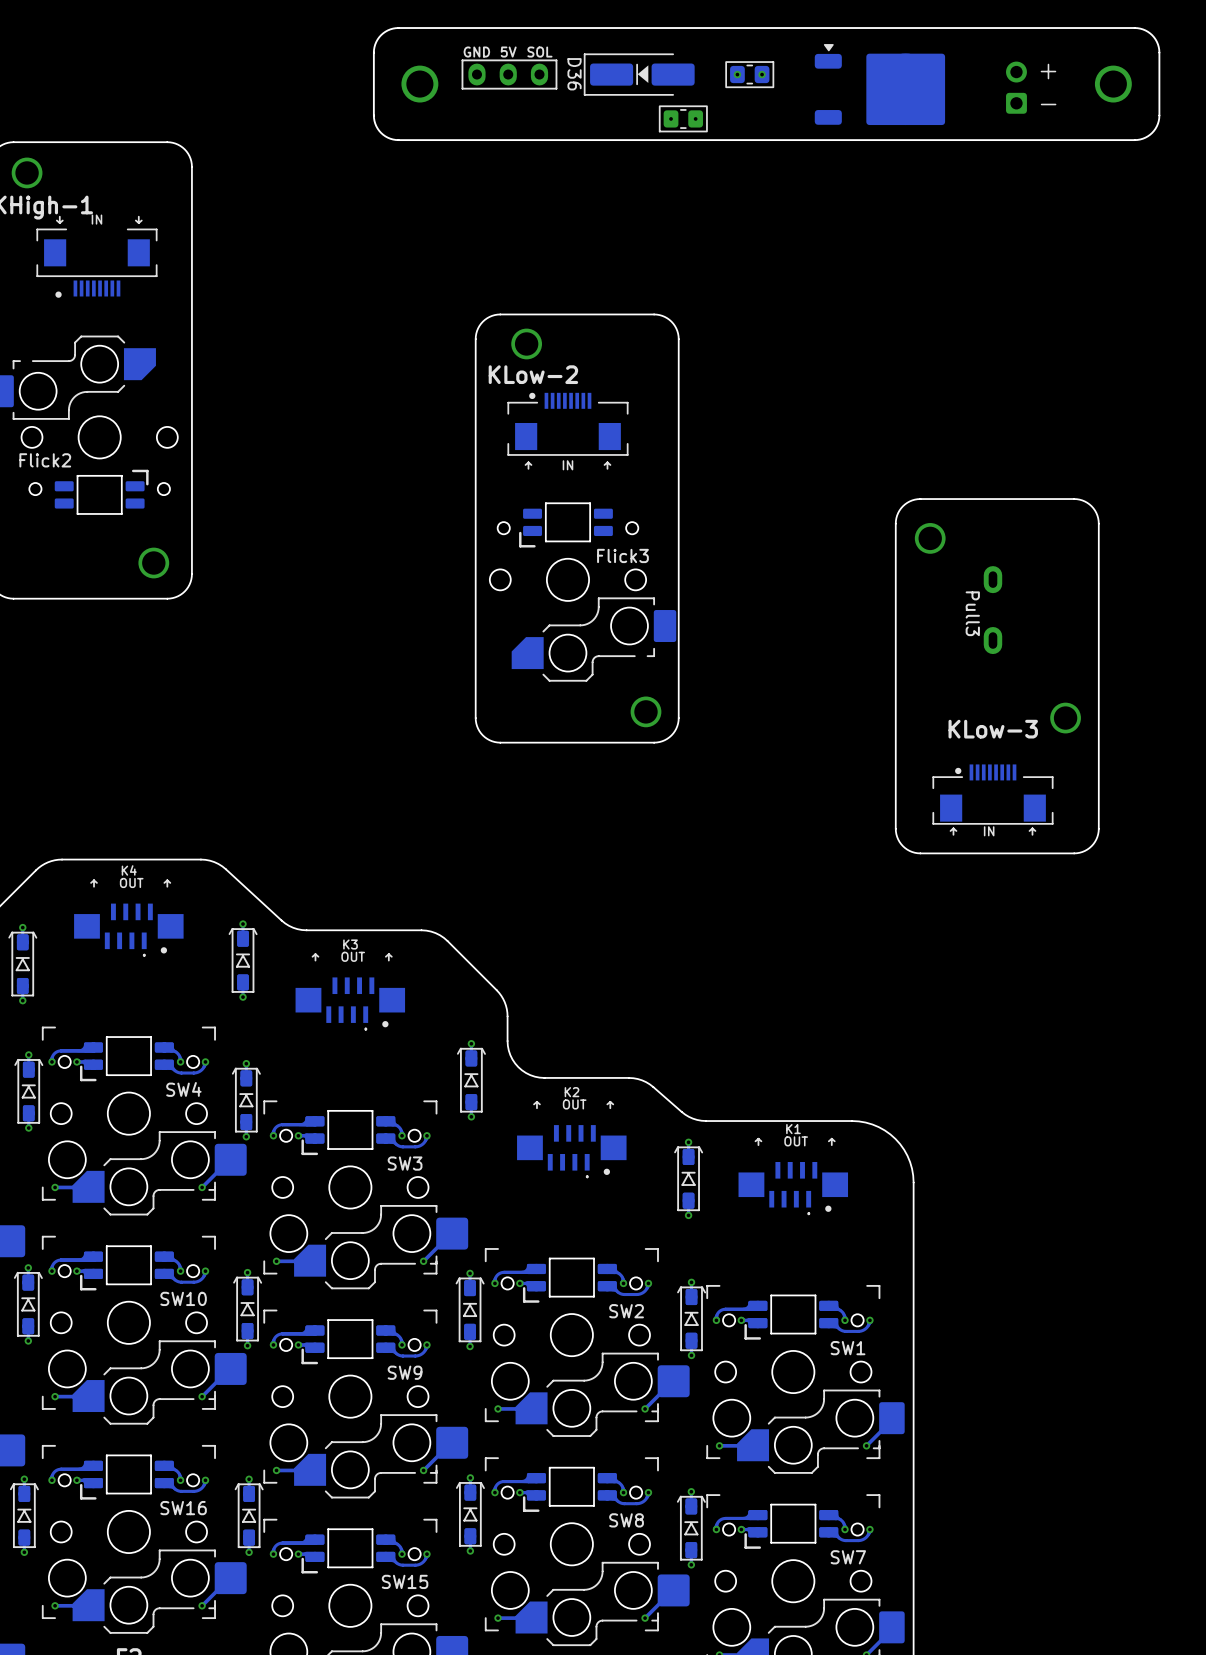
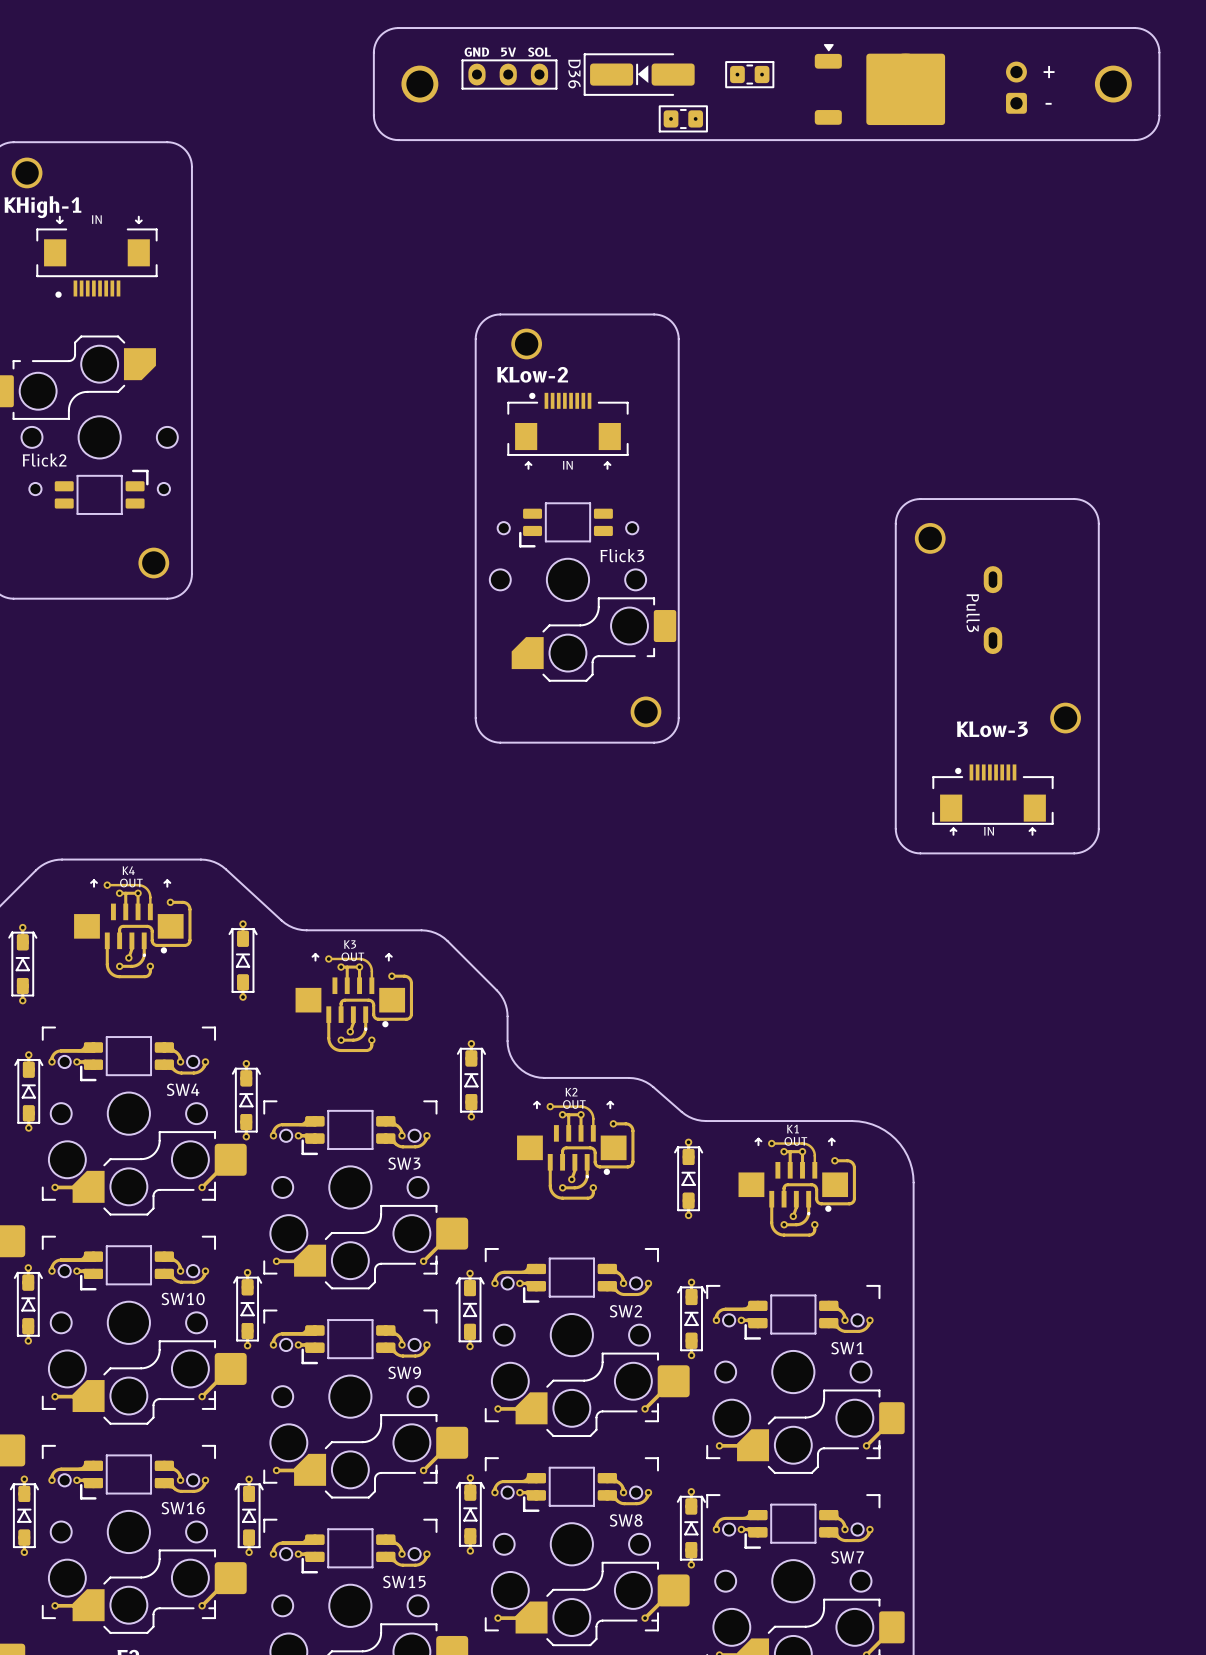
K4 footprint: [74, 879, 184, 957] -> [74, 879, 192, 979]
K3 footprint: [295, 953, 406, 1031] -> [295, 953, 414, 1053]
K2 footprint: [517, 1101, 627, 1178] -> [517, 1101, 635, 1200]
K1 footprint: [738, 1138, 849, 1215] -> [738, 1138, 856, 1237]

